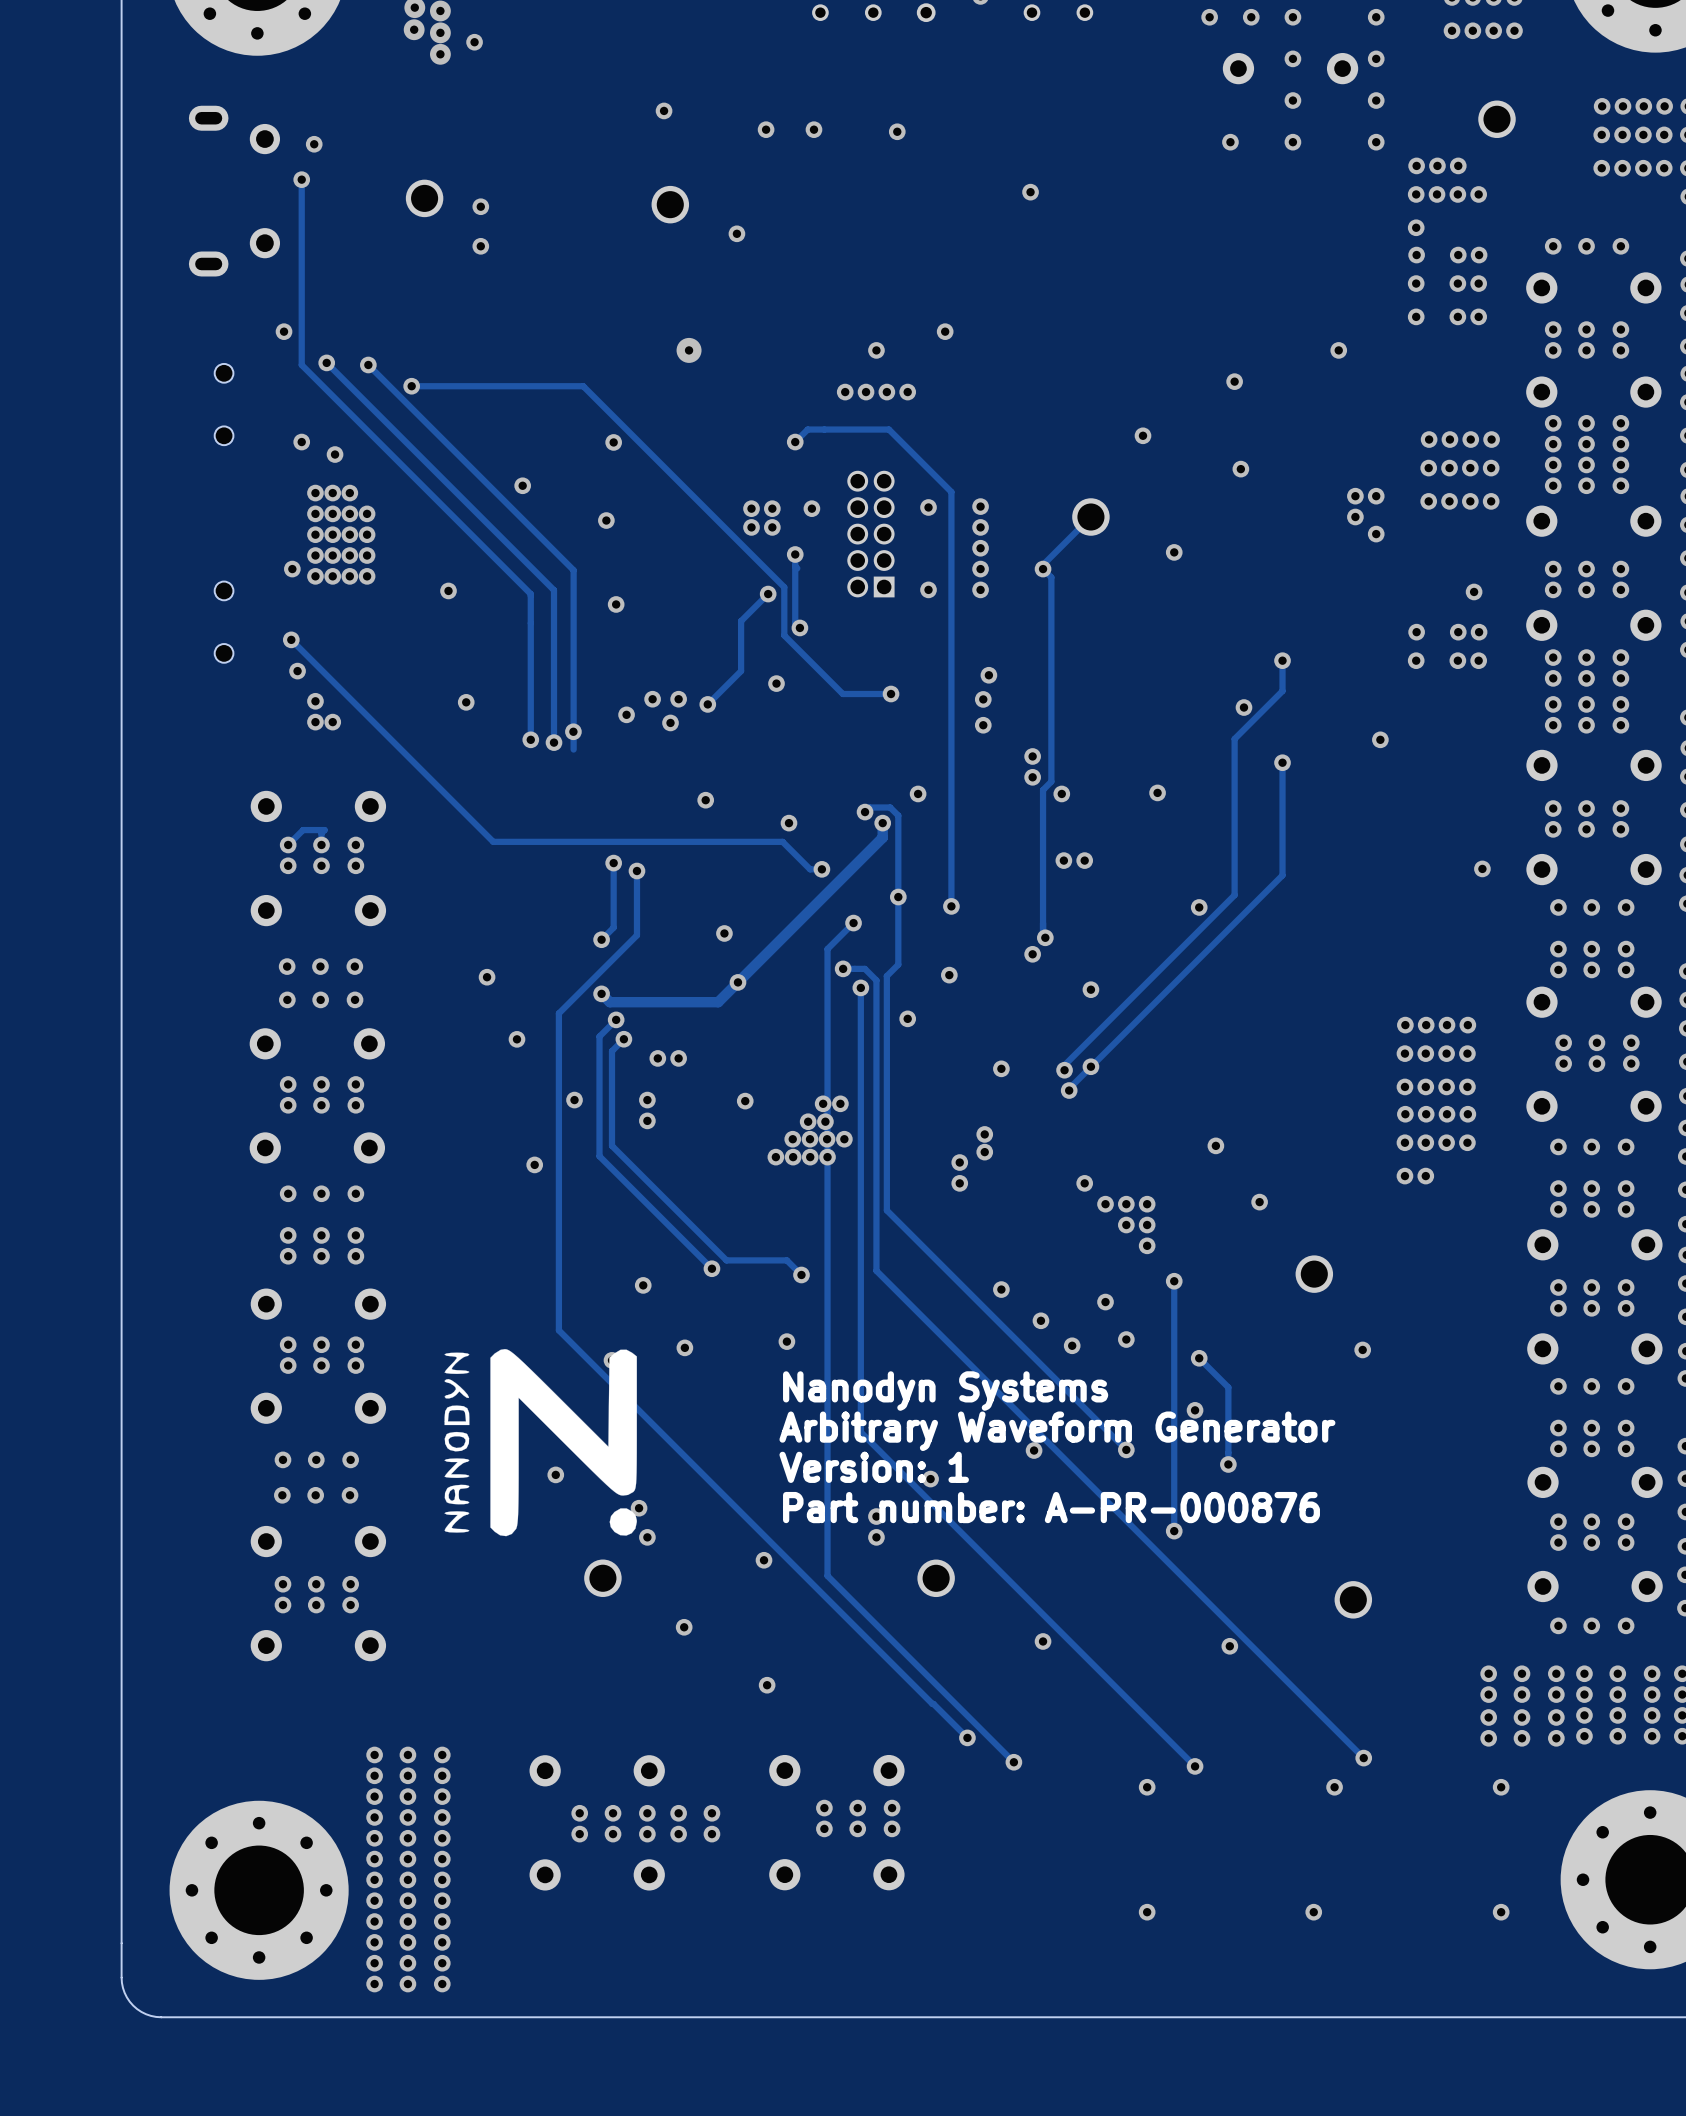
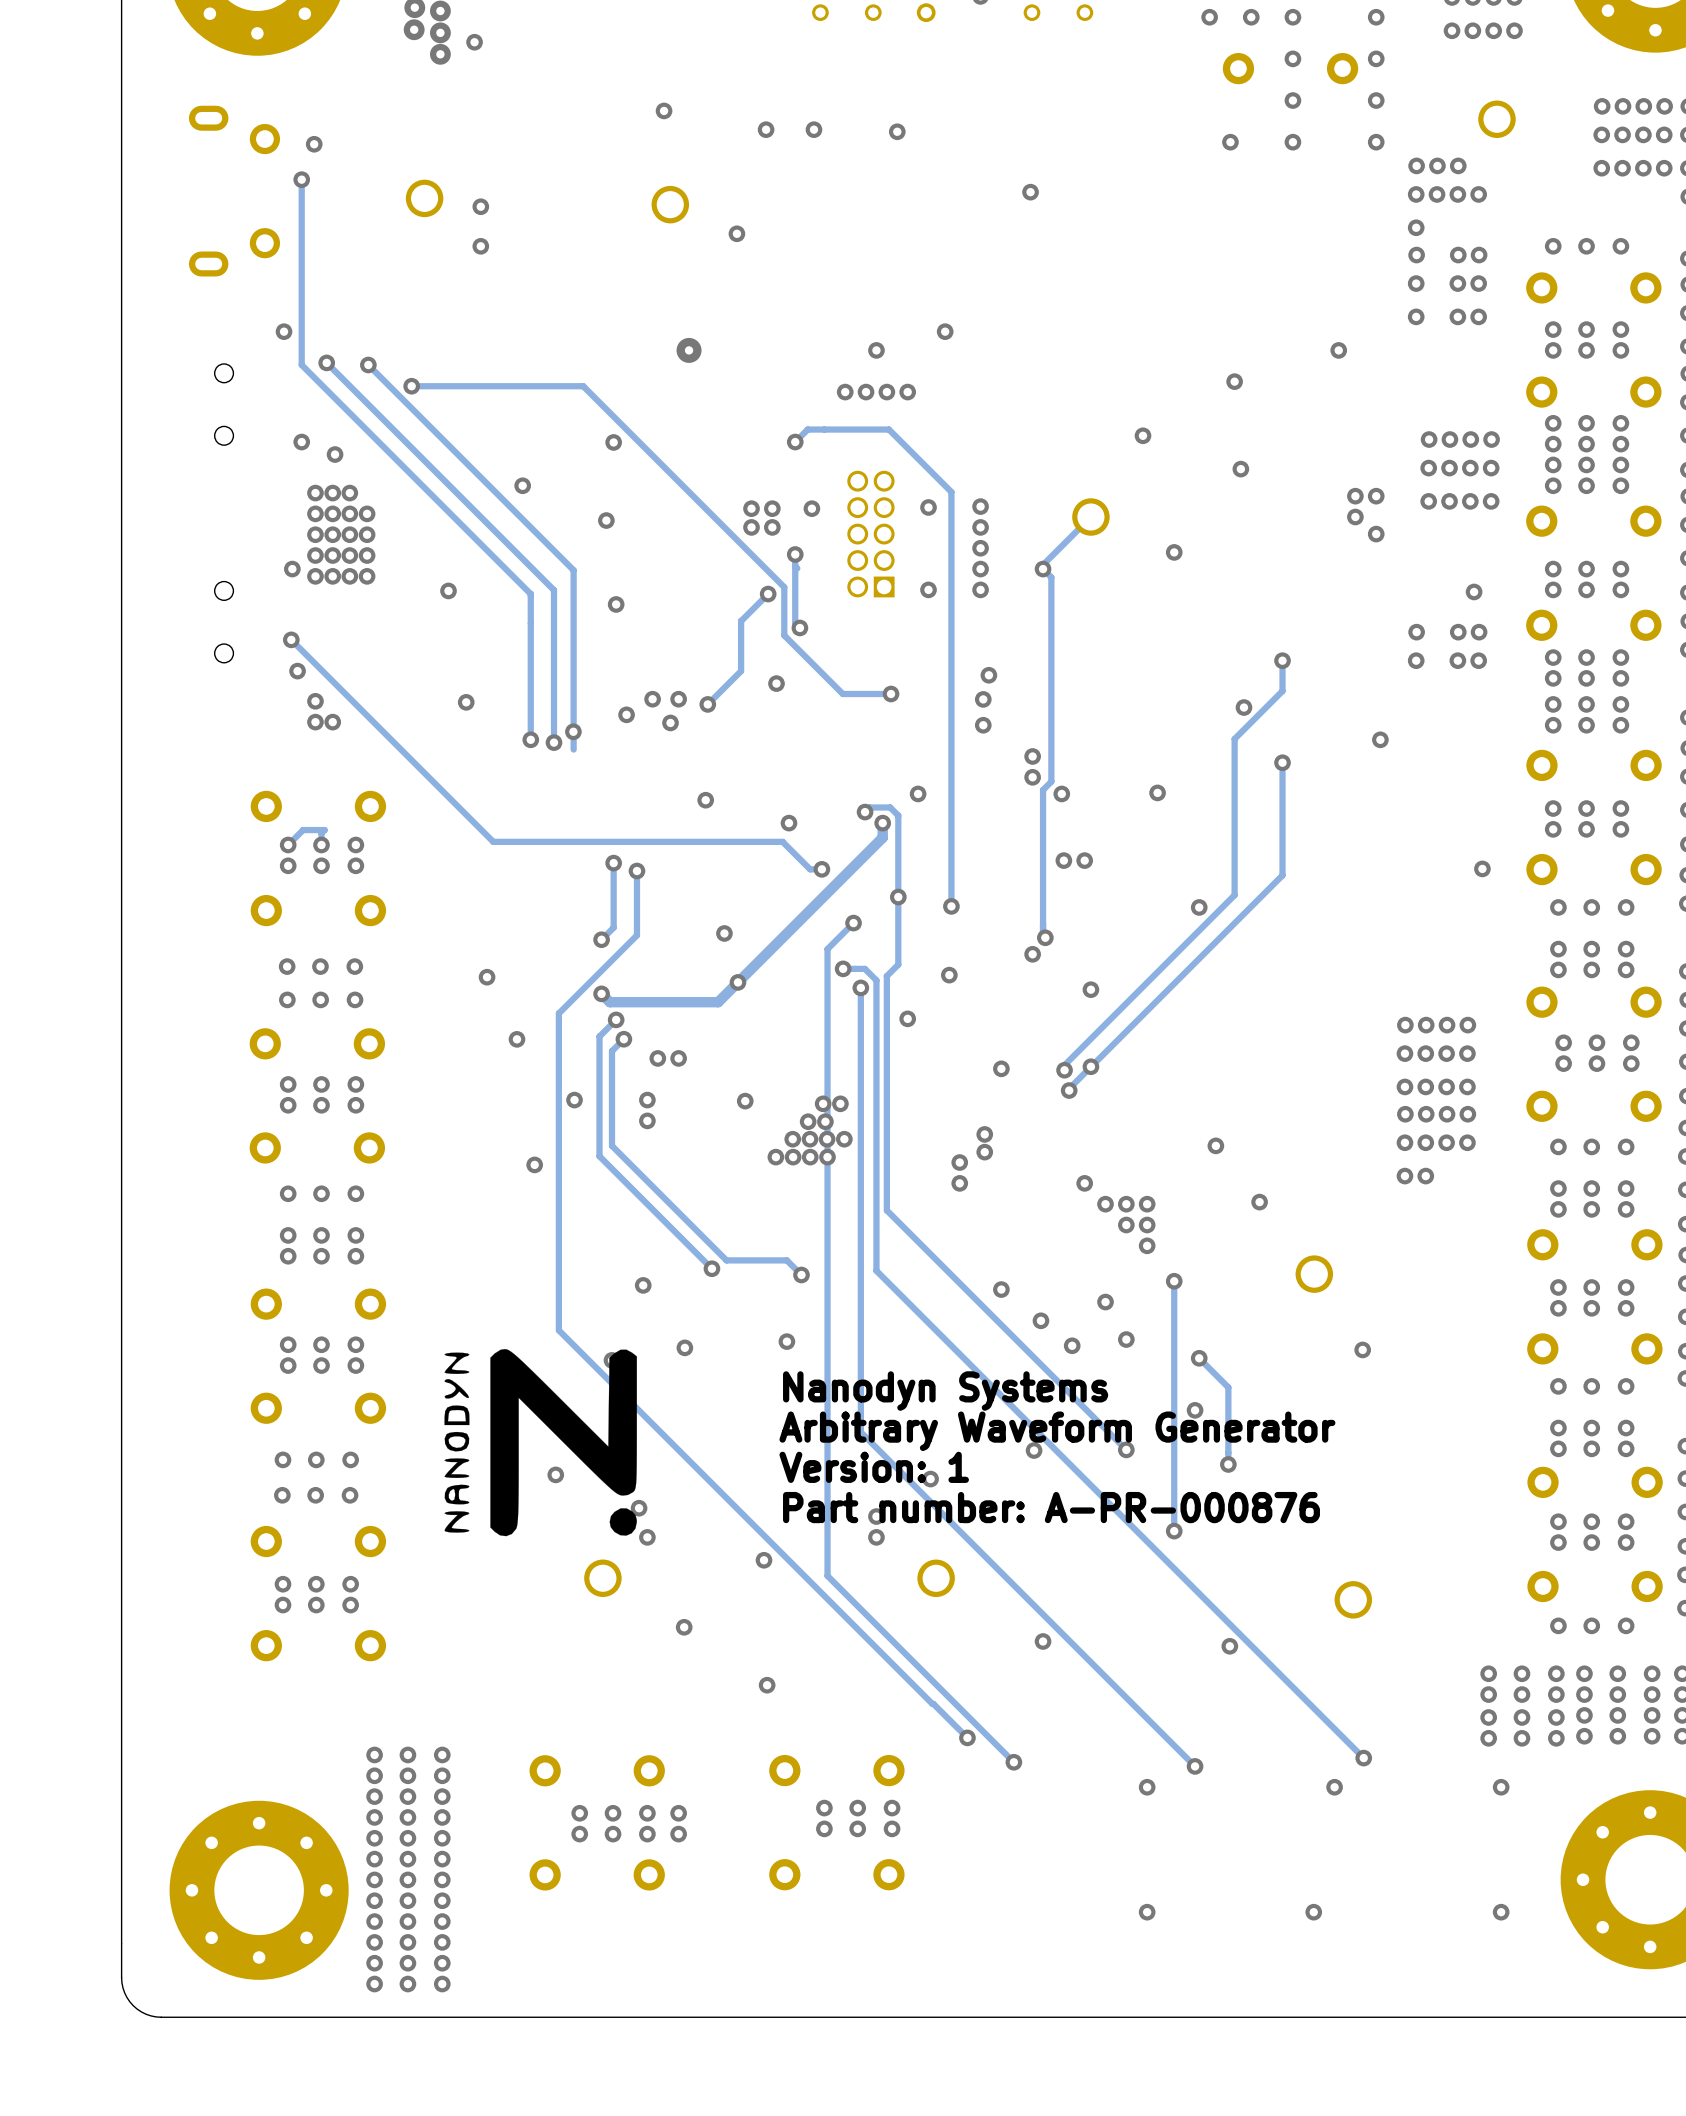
via: (711, 1813) -> none
via: (711, 1834) -> none

